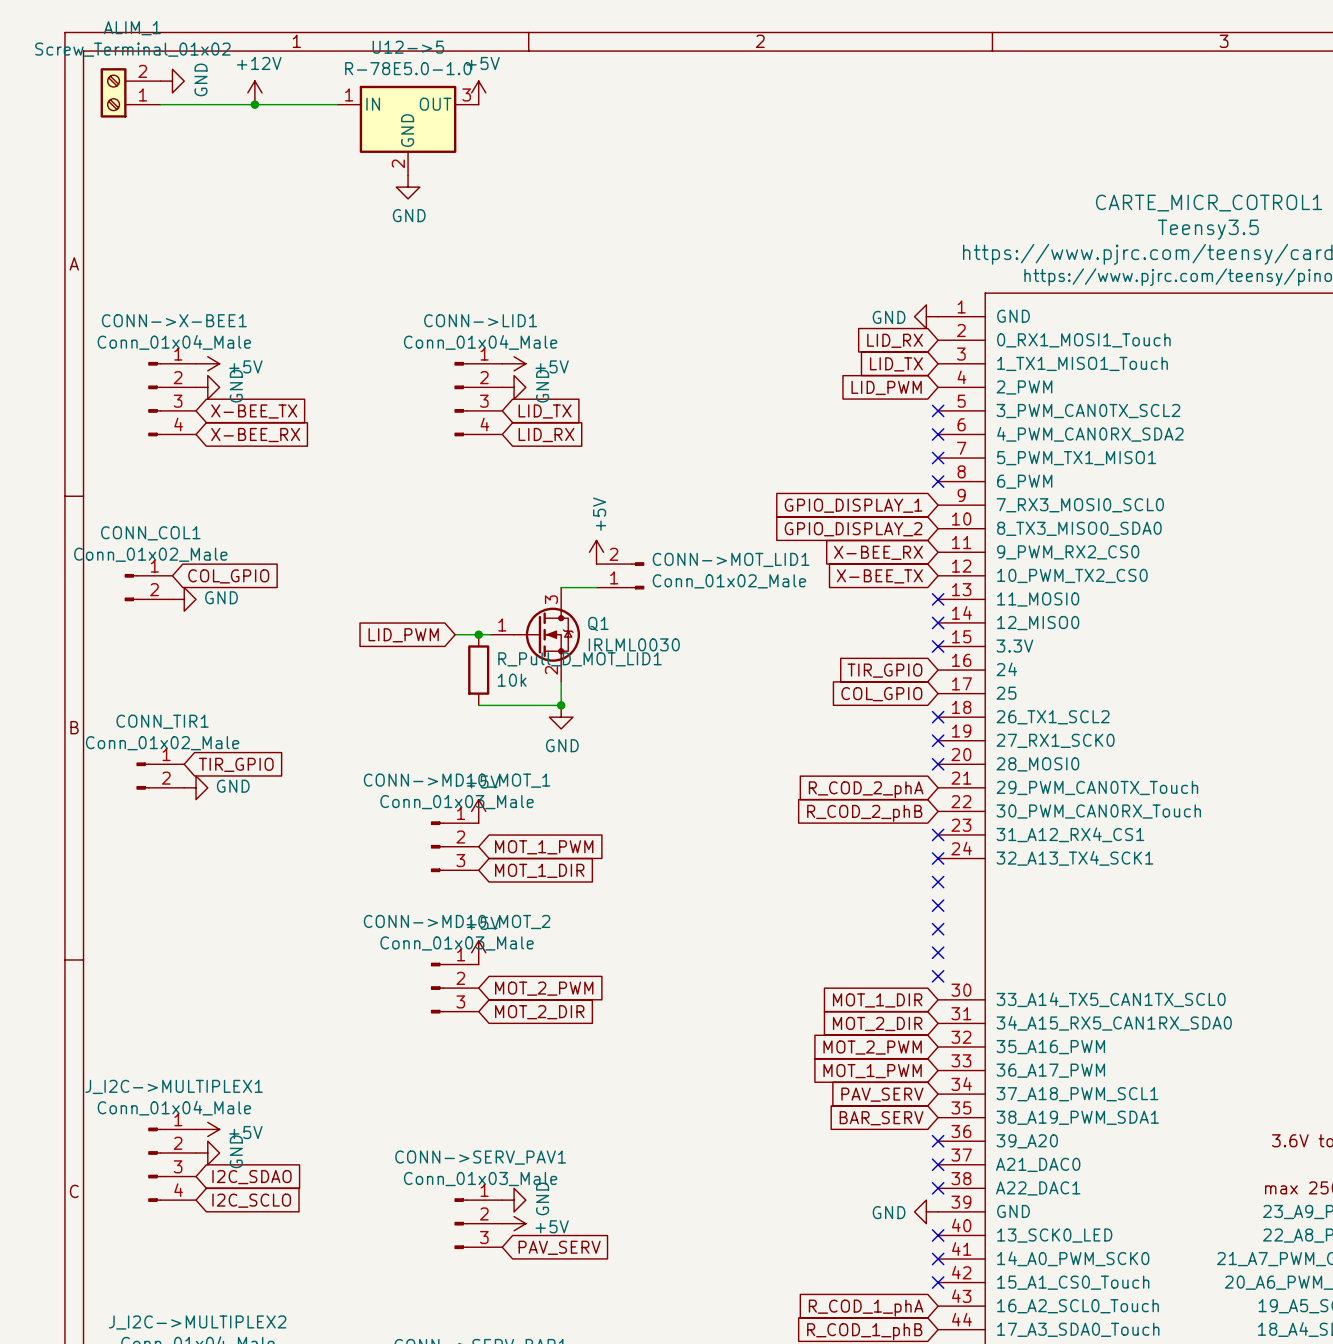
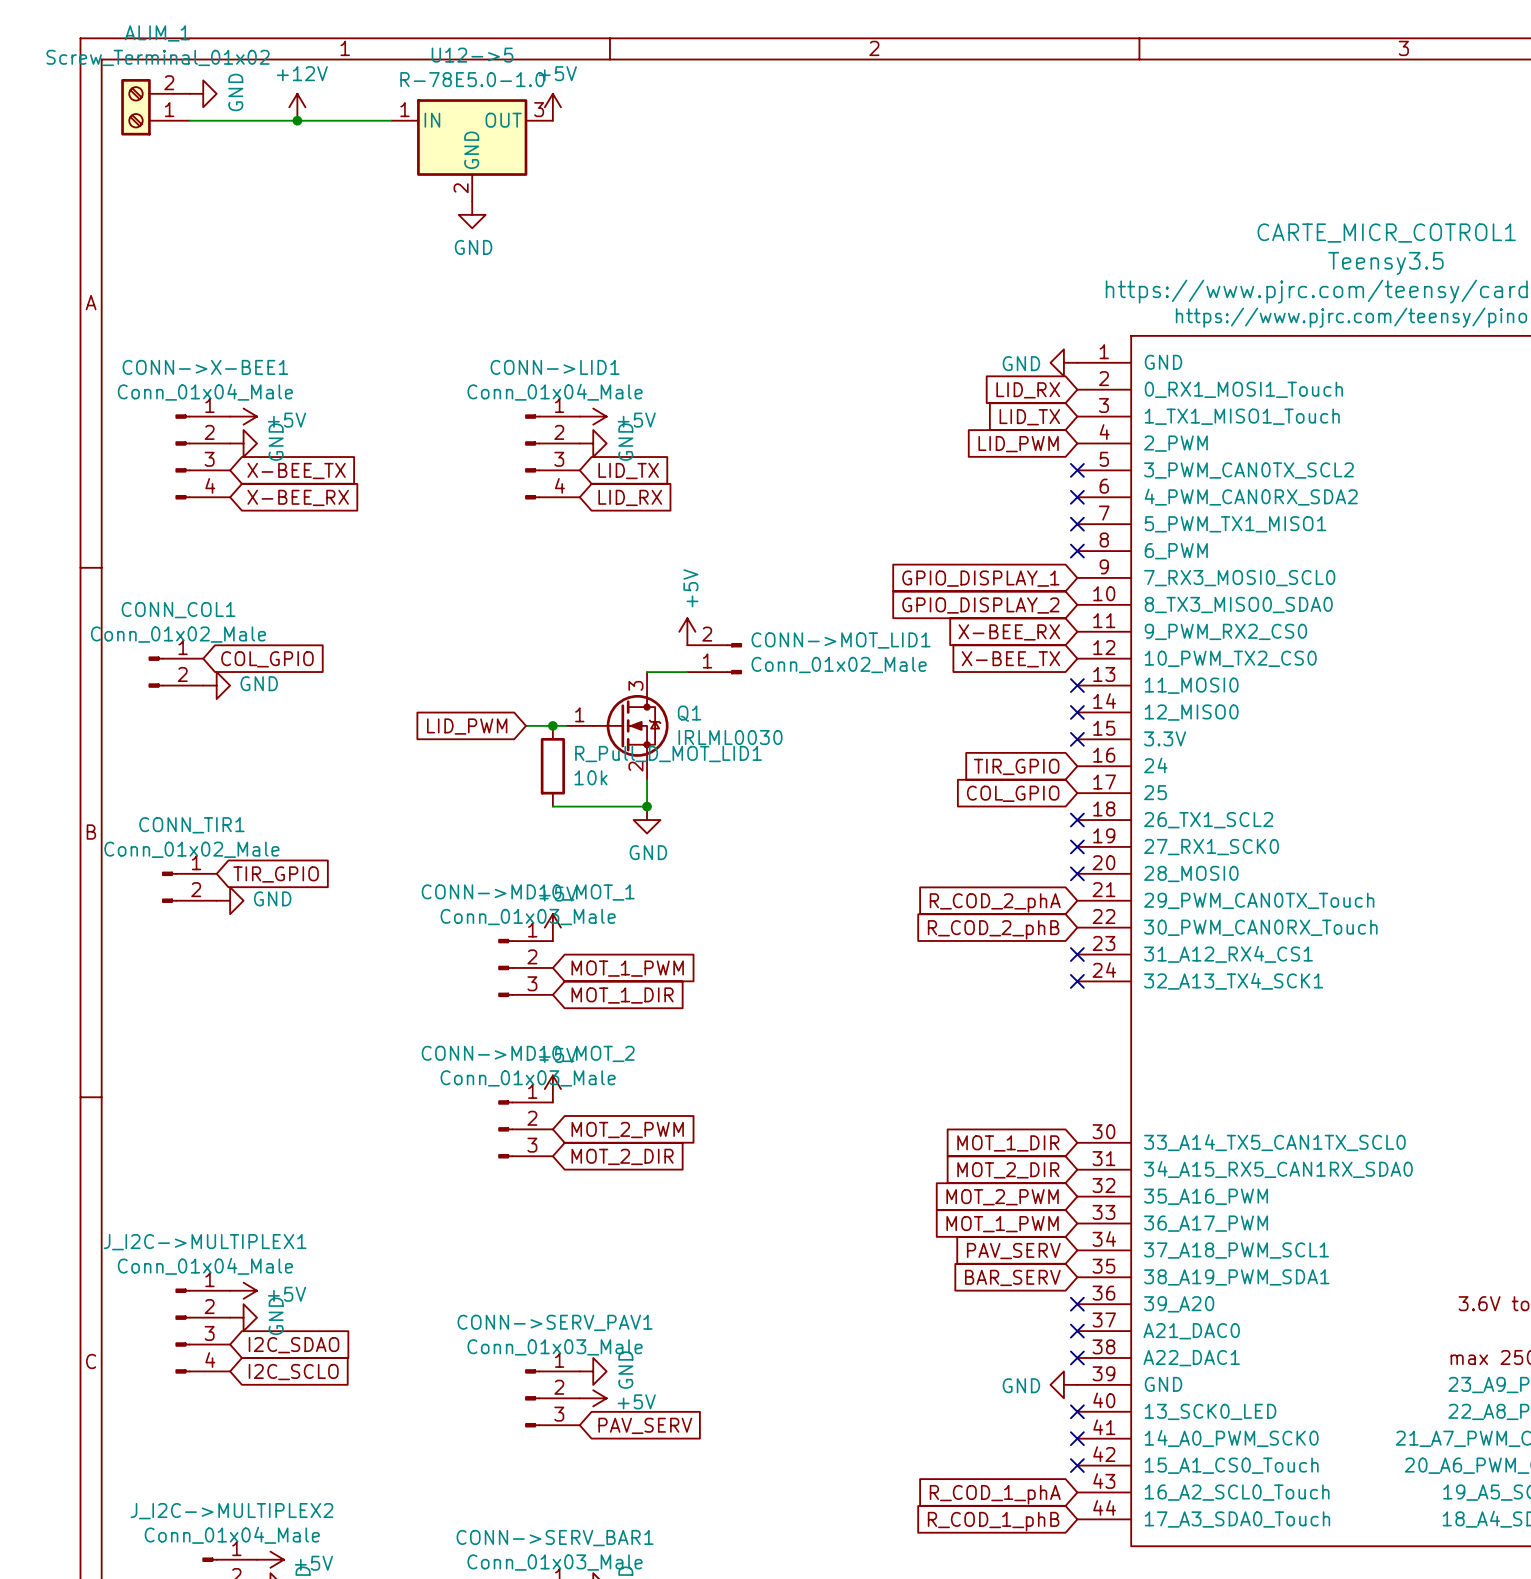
no-connect mark: (938, 882) -> none
no-connect mark: (938, 905) -> none
no-connect mark: (938, 929) -> none
no-connect mark: (938, 952) -> none
no-connect mark: (938, 976) -> none

